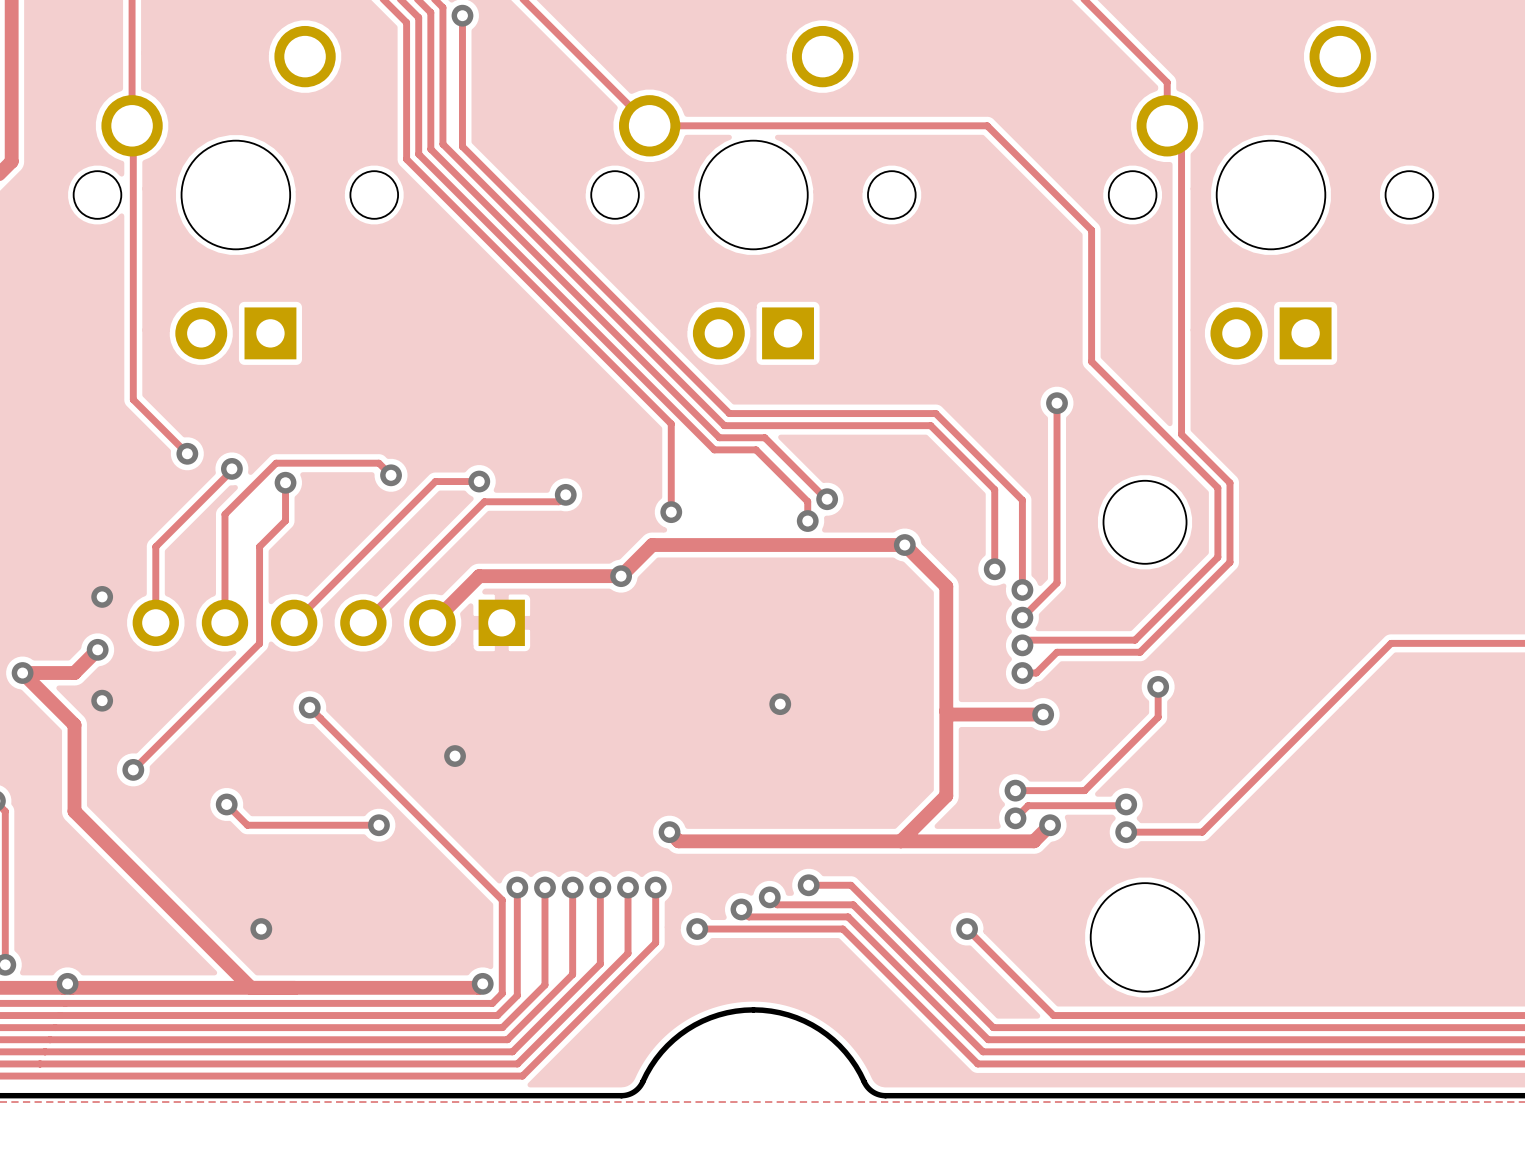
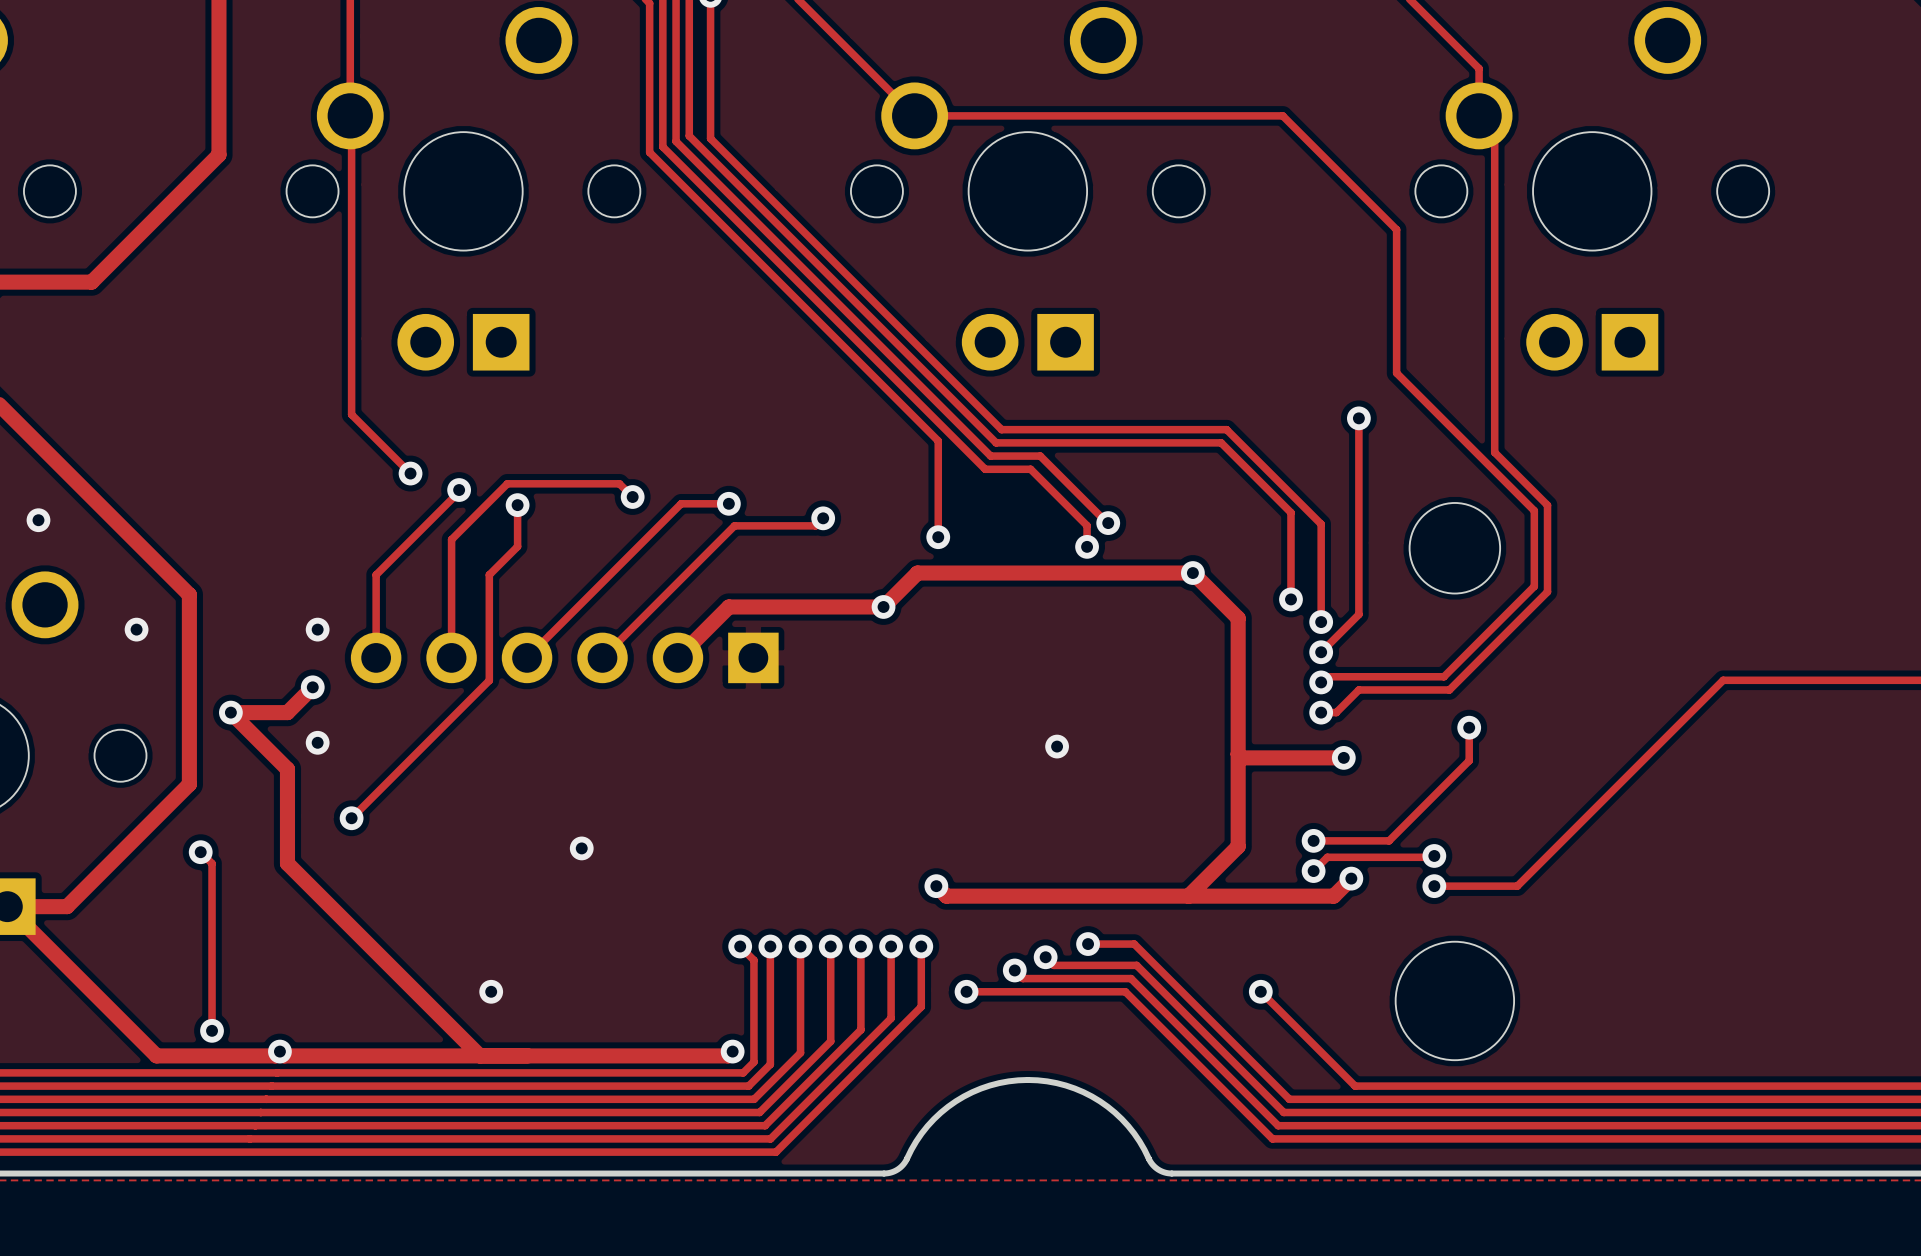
track: (309, 707) (489, 887) -> none
via: (309, 707) -> none
via: (455, 756) -> none
track: (226, 804) (247, 825) (378, 825) -> none
via: (226, 804) -> none
via position: (378, 825) -> (581, 848)
via: none -> (740, 946)

